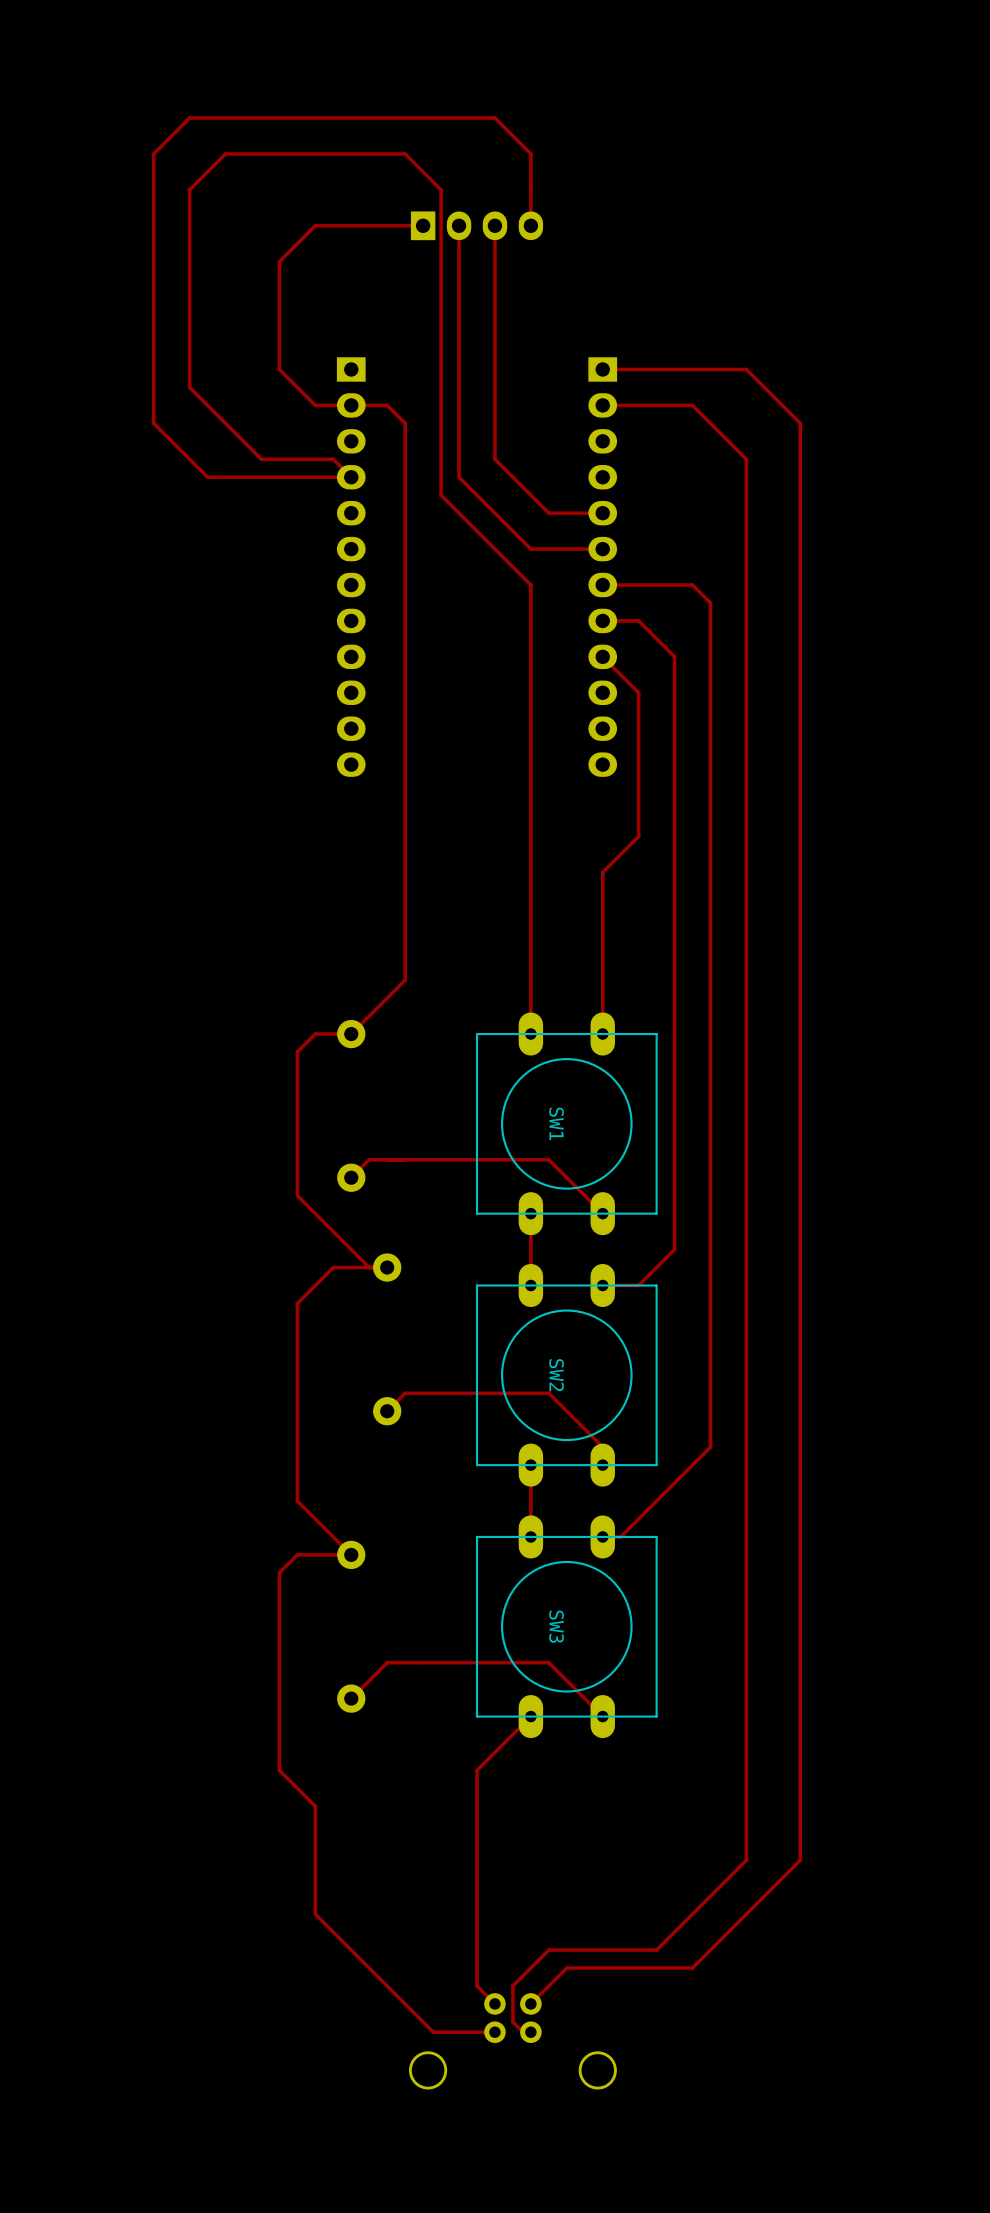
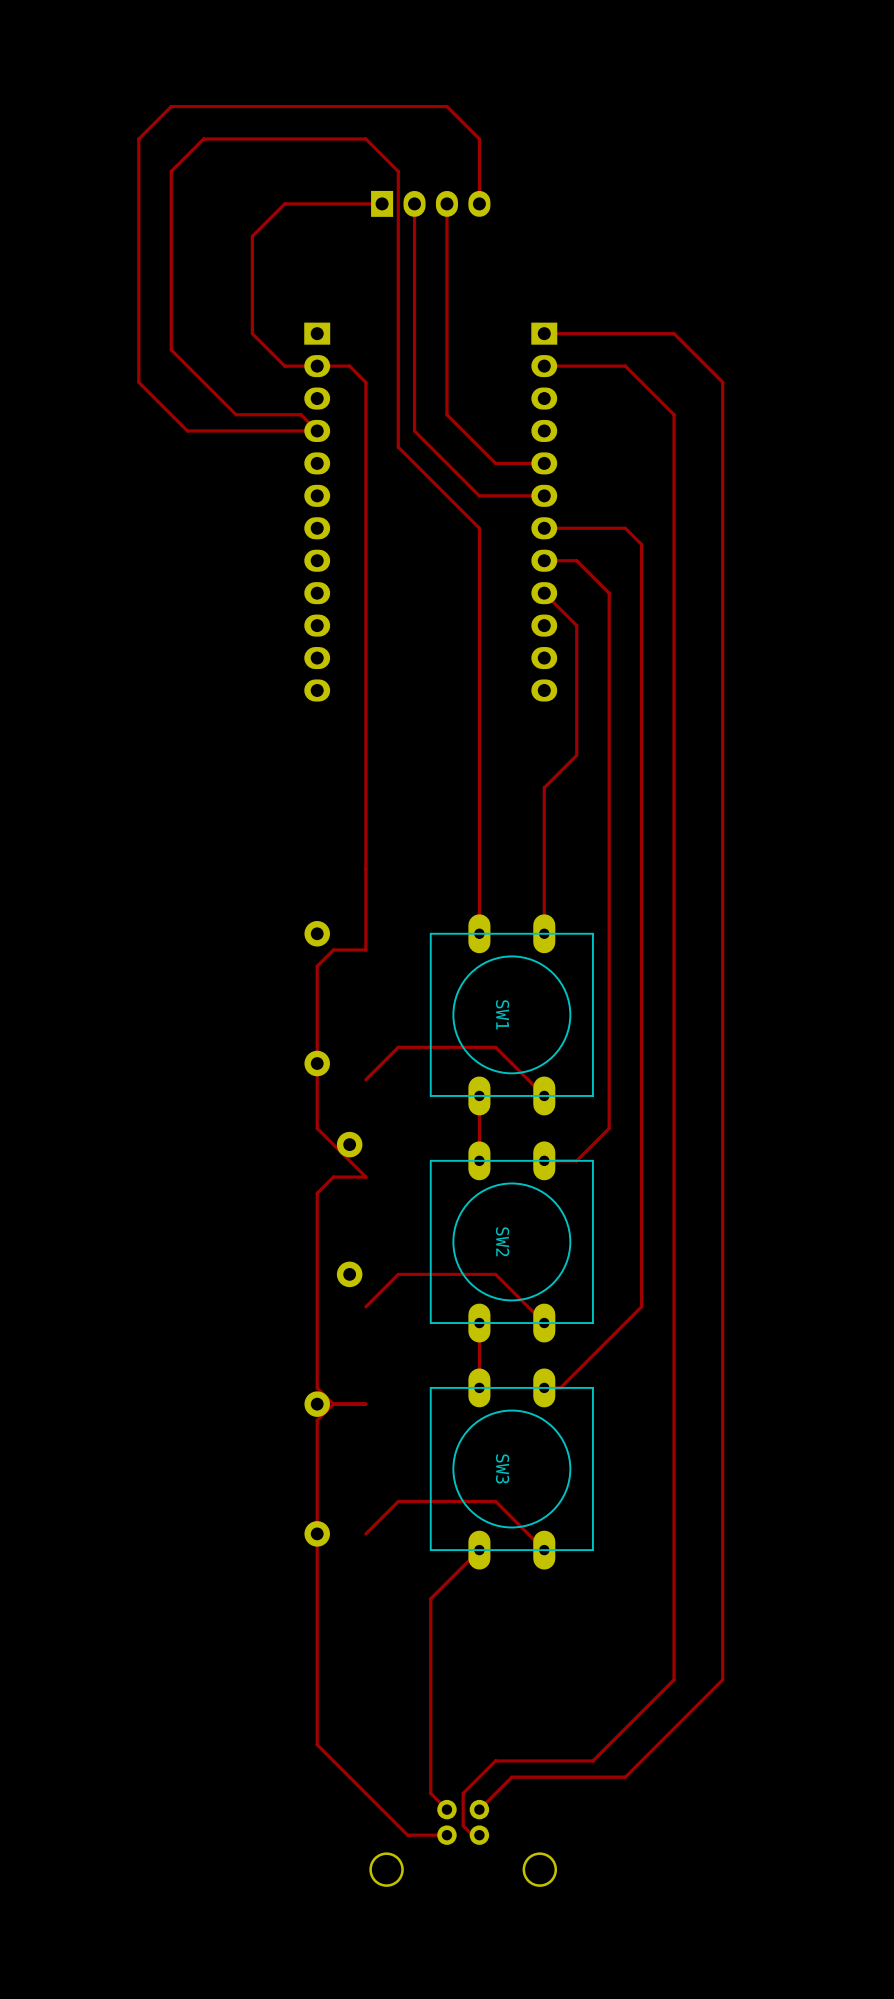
top track: (405, 980) (351, 1034) (315, 1034) (297, 1052) (297, 1195) (351, 1249) -> (365, 885) (365, 949) (333, 949) (317, 966) (317, 1128)
top track: (441, 1159) (369, 1159) (351, 1177) -> (398, 1047) (365, 1079)
top track: none -> (333, 1144) (365, 1177) (333, 1177) (317, 1193) (317, 1387) (333, 1404)
top track: (387, 1267) (333, 1267) (297, 1303) (297, 1501) (351, 1554) (297, 1554) (279, 1572) (279, 1770) (315, 1806) (315, 1914) (433, 2032) (451, 2032) -> (333, 1404) (317, 1420) (317, 1744) (407, 1835)
top track: (387, 1411) (405, 1393) (548, 1393) (602, 1447) -> none
top track: none -> (365, 1306) (398, 1274) (495, 1274) (544, 1323)
top track: none -> (365, 1404) (333, 1404)
top track: (441, 1662) (387, 1662) (351, 1698) -> (398, 1501) (365, 1533)

